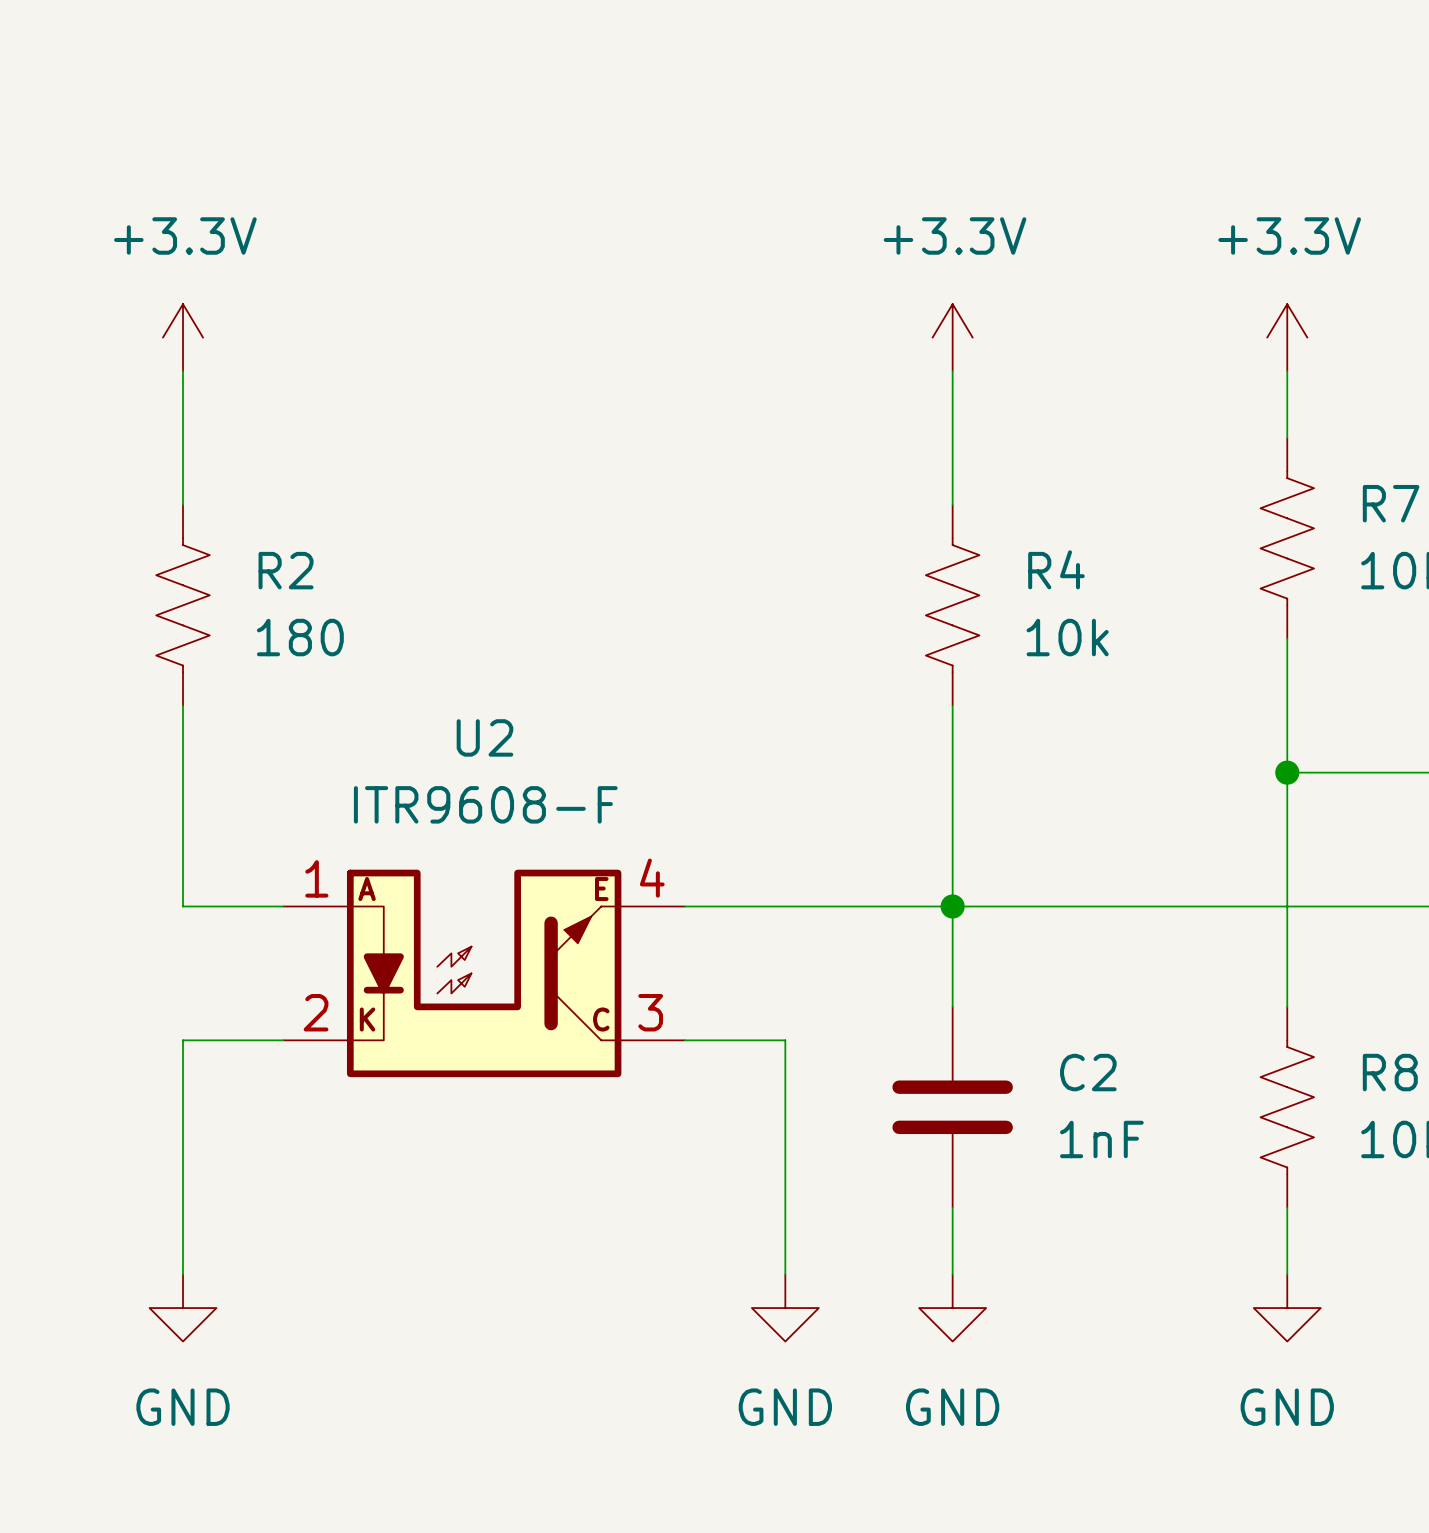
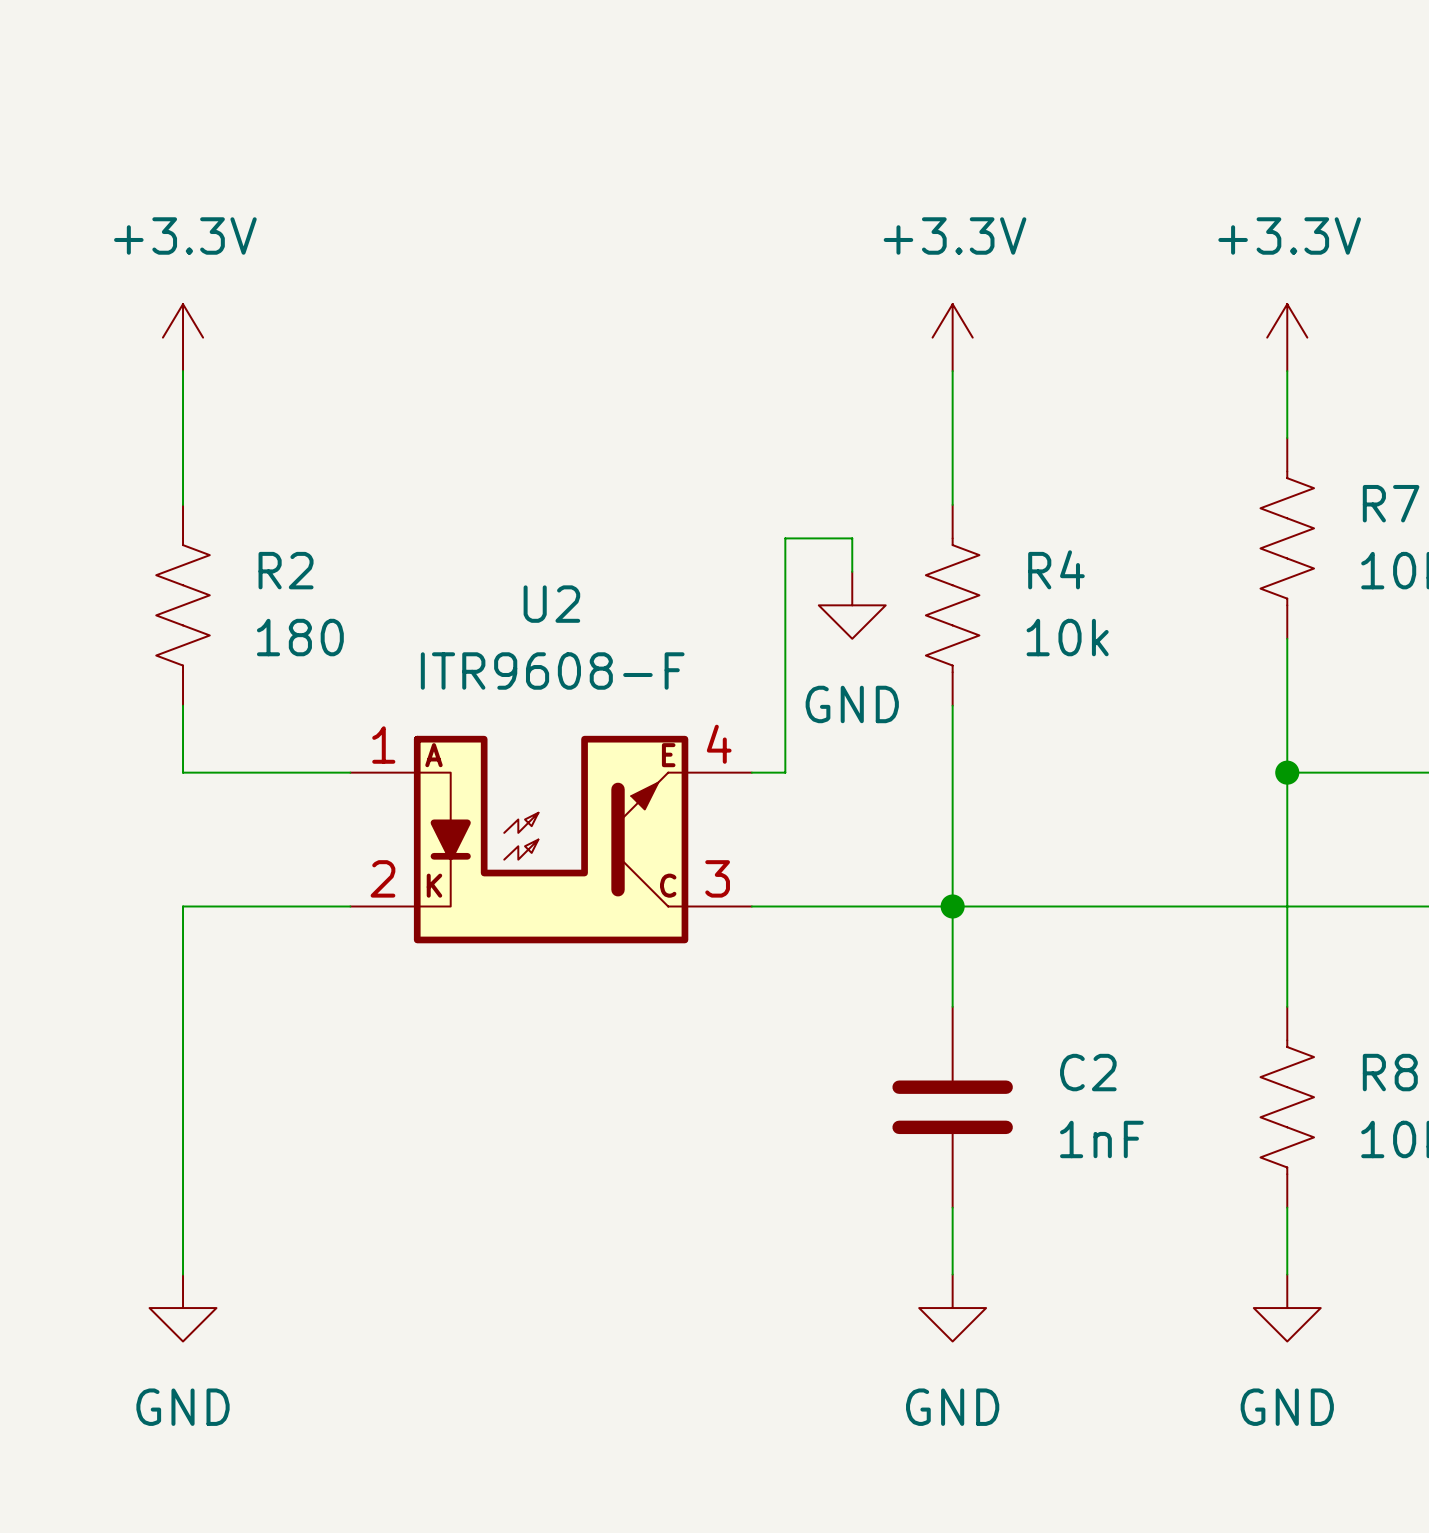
wire: none -> (852, 571) (852, 538) (785, 538) (785, 772) (751, 772)
power symbol: none -> GND (852, 605)
wire: (183, 772) (183, 906) -> (183, 772) (350, 772)
U2 position: (484, 973) -> (551, 839)
wire: (183, 1040) (283, 1040) -> (183, 1040) (183, 906)
wire: (684, 1040) (785, 1040) (785, 1274) -> none
power symbol: GND (785, 1308) -> none

